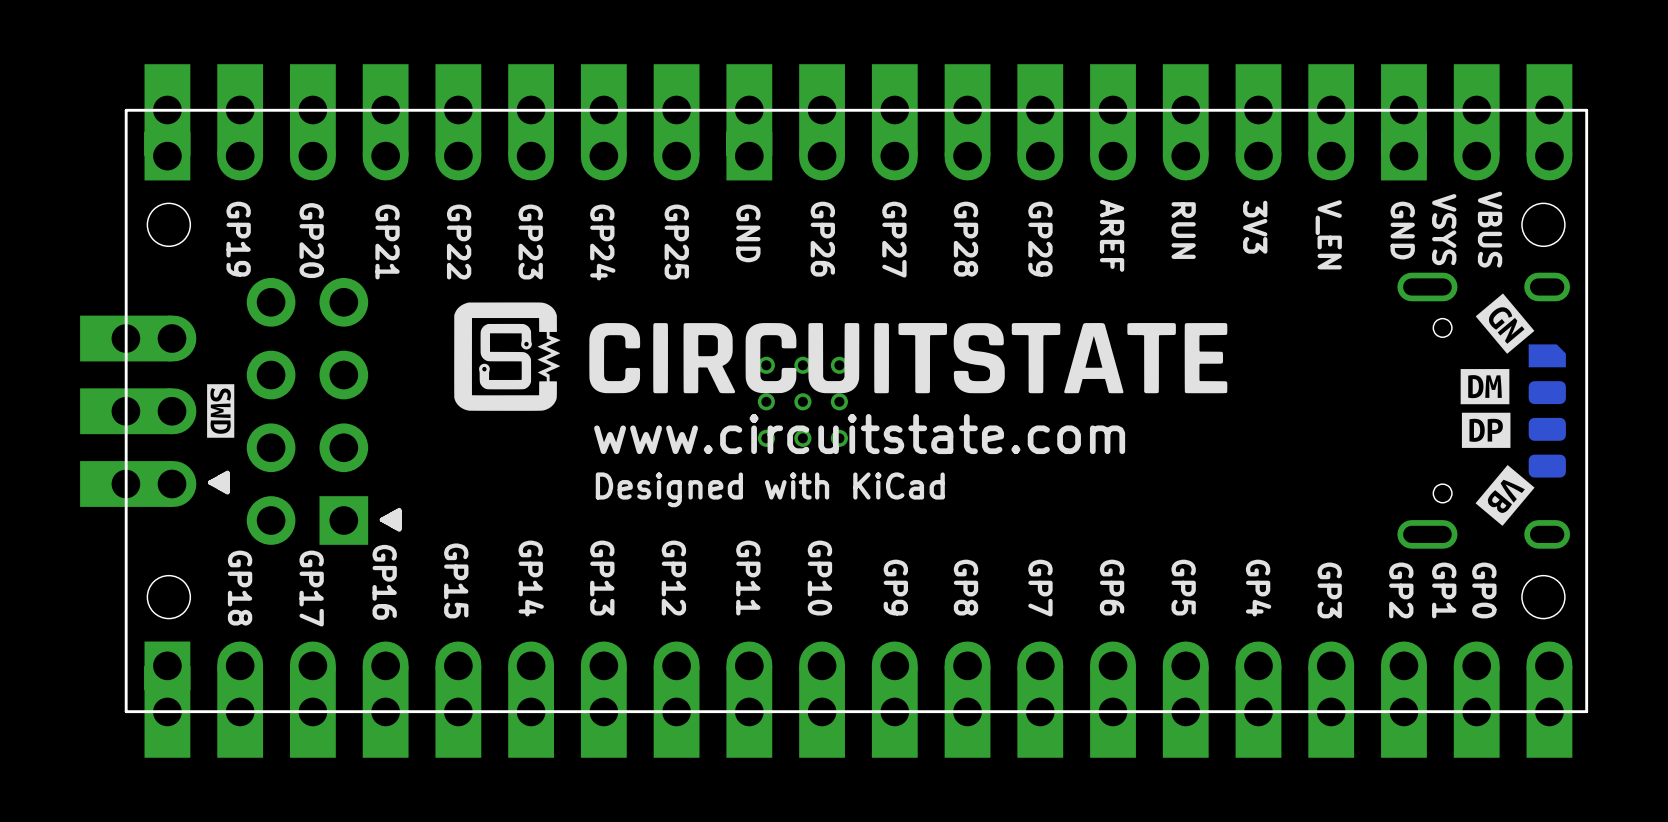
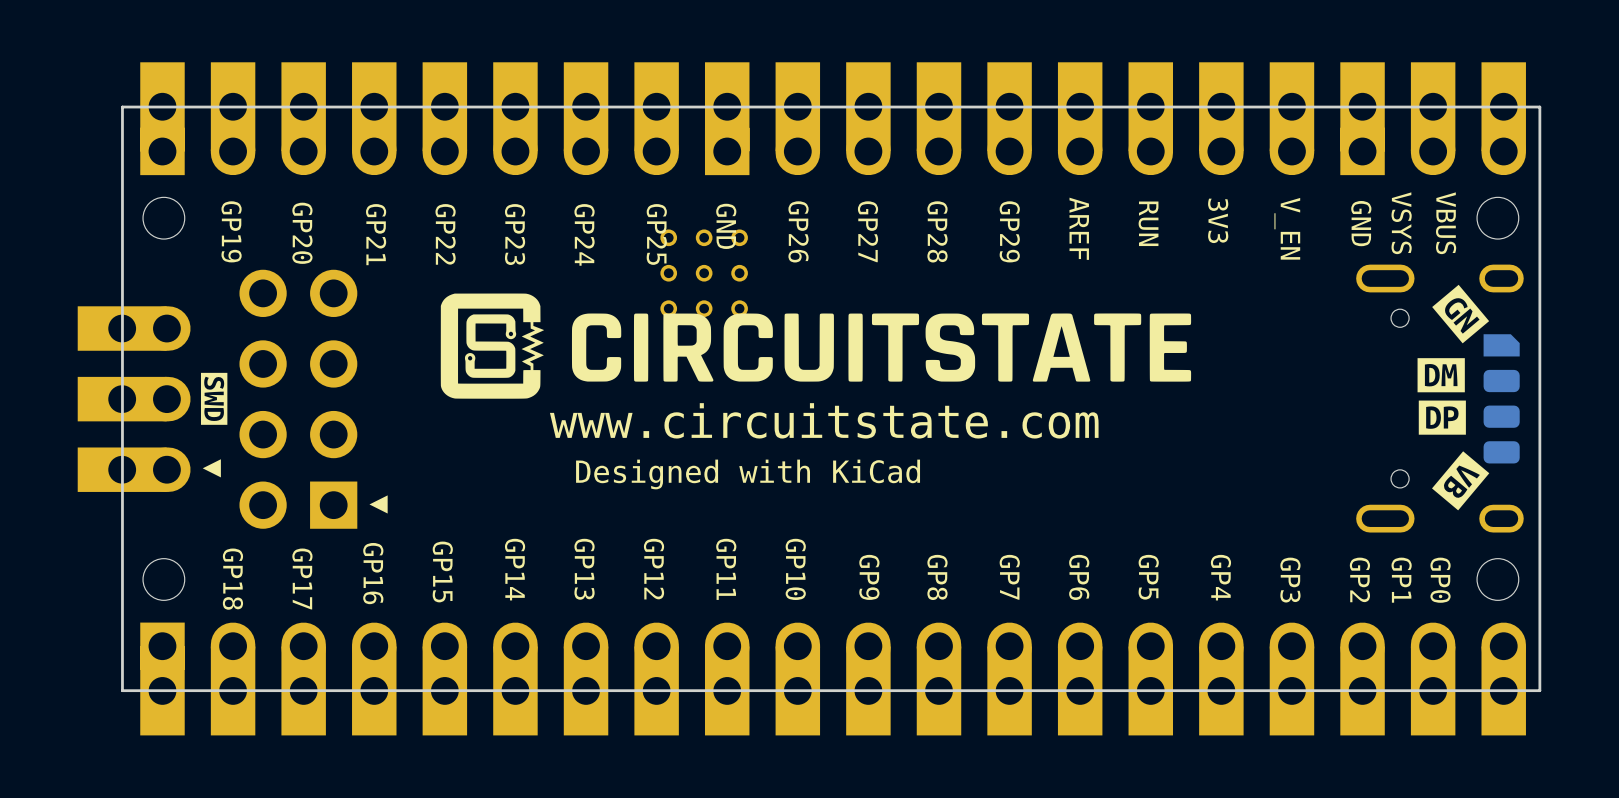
part position: (802, 401) -> (704, 273)

